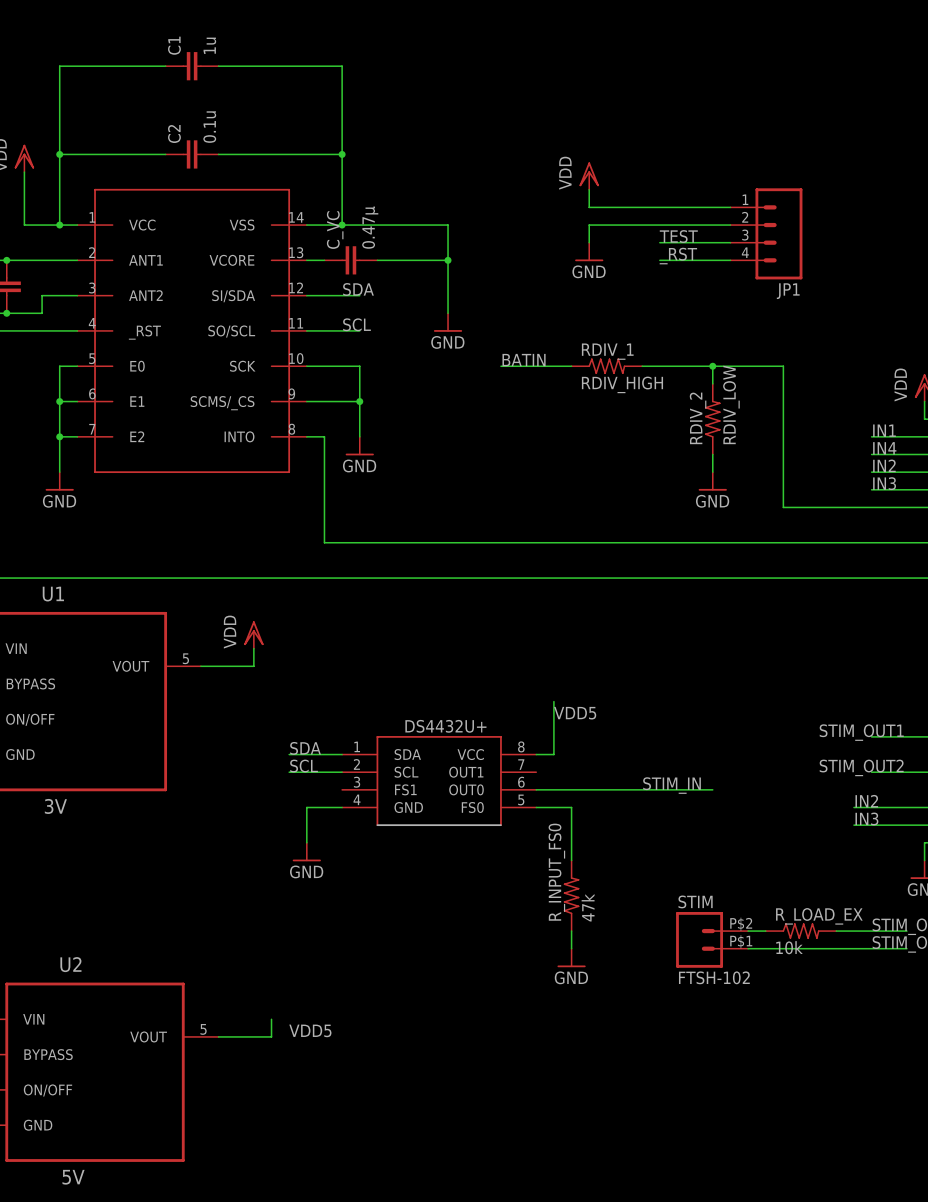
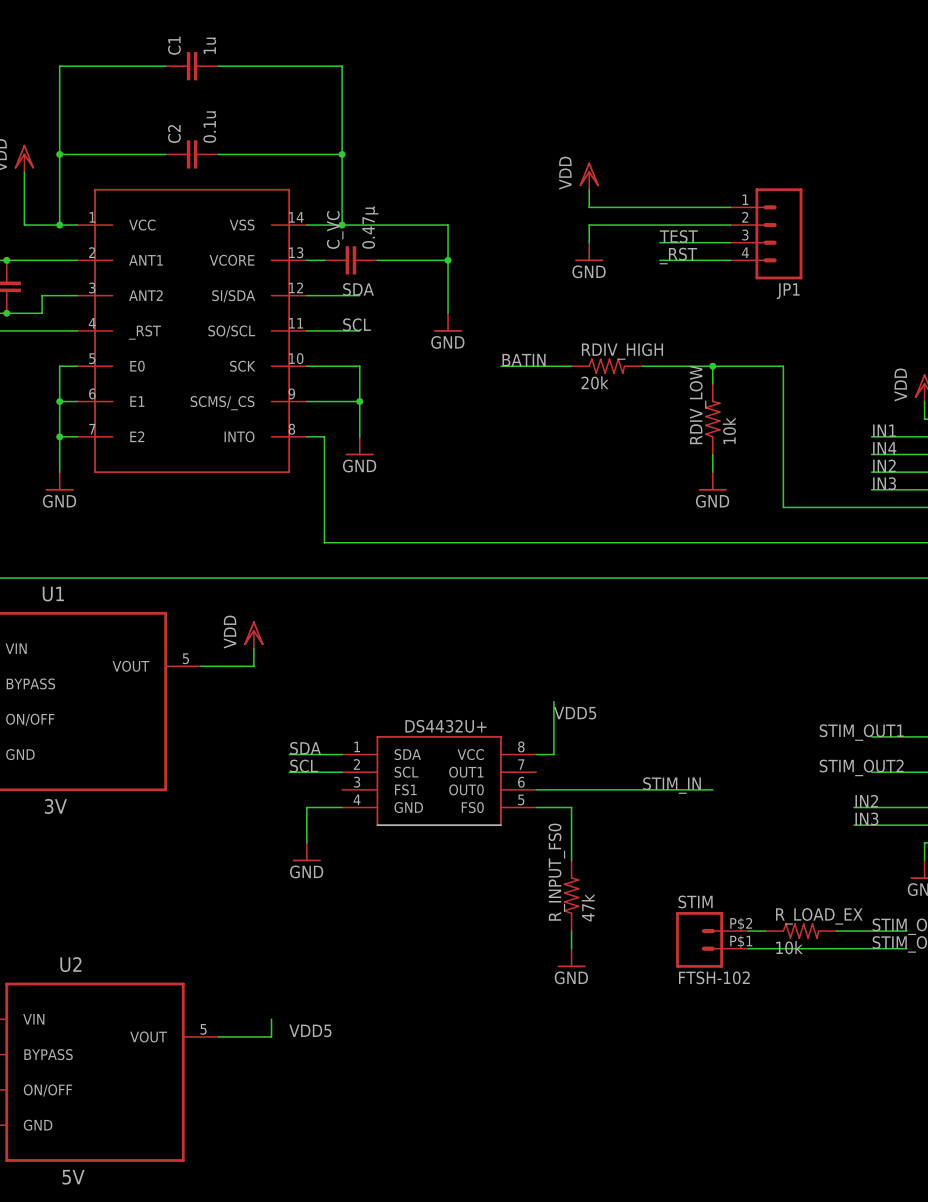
RDIV_1 name: RDIV_1 (607, 351) -> RDIV_HIGH (622, 351)
RDIV_1 value: RDIV_HIGH (622, 384) -> 20k (595, 382)
RDIV_2 value: RDIV_LOW (731, 404) -> 10k (729, 430)
RDIV_2 name: RDIV_2 (698, 418) -> RDIV_LOW (698, 404)

